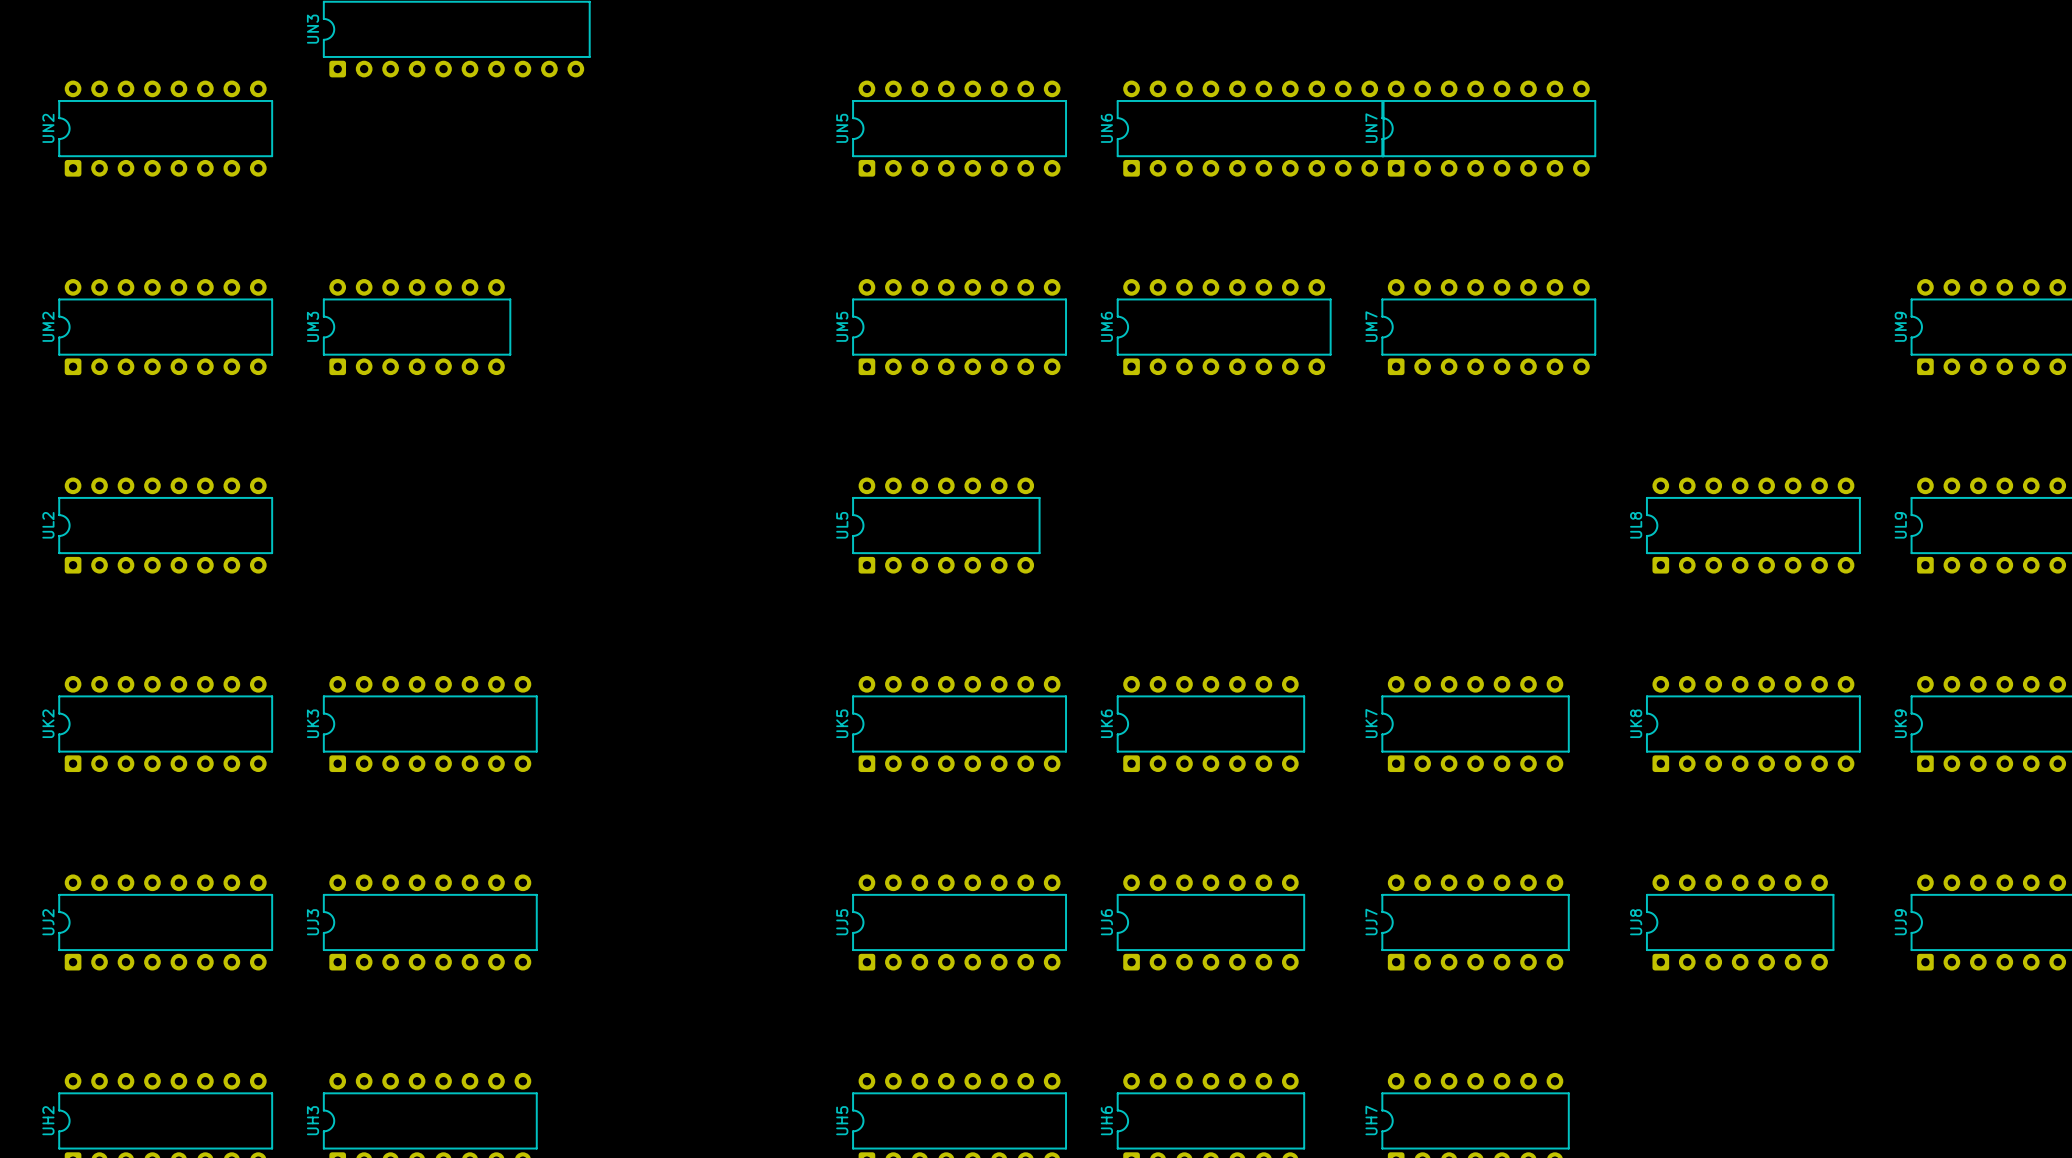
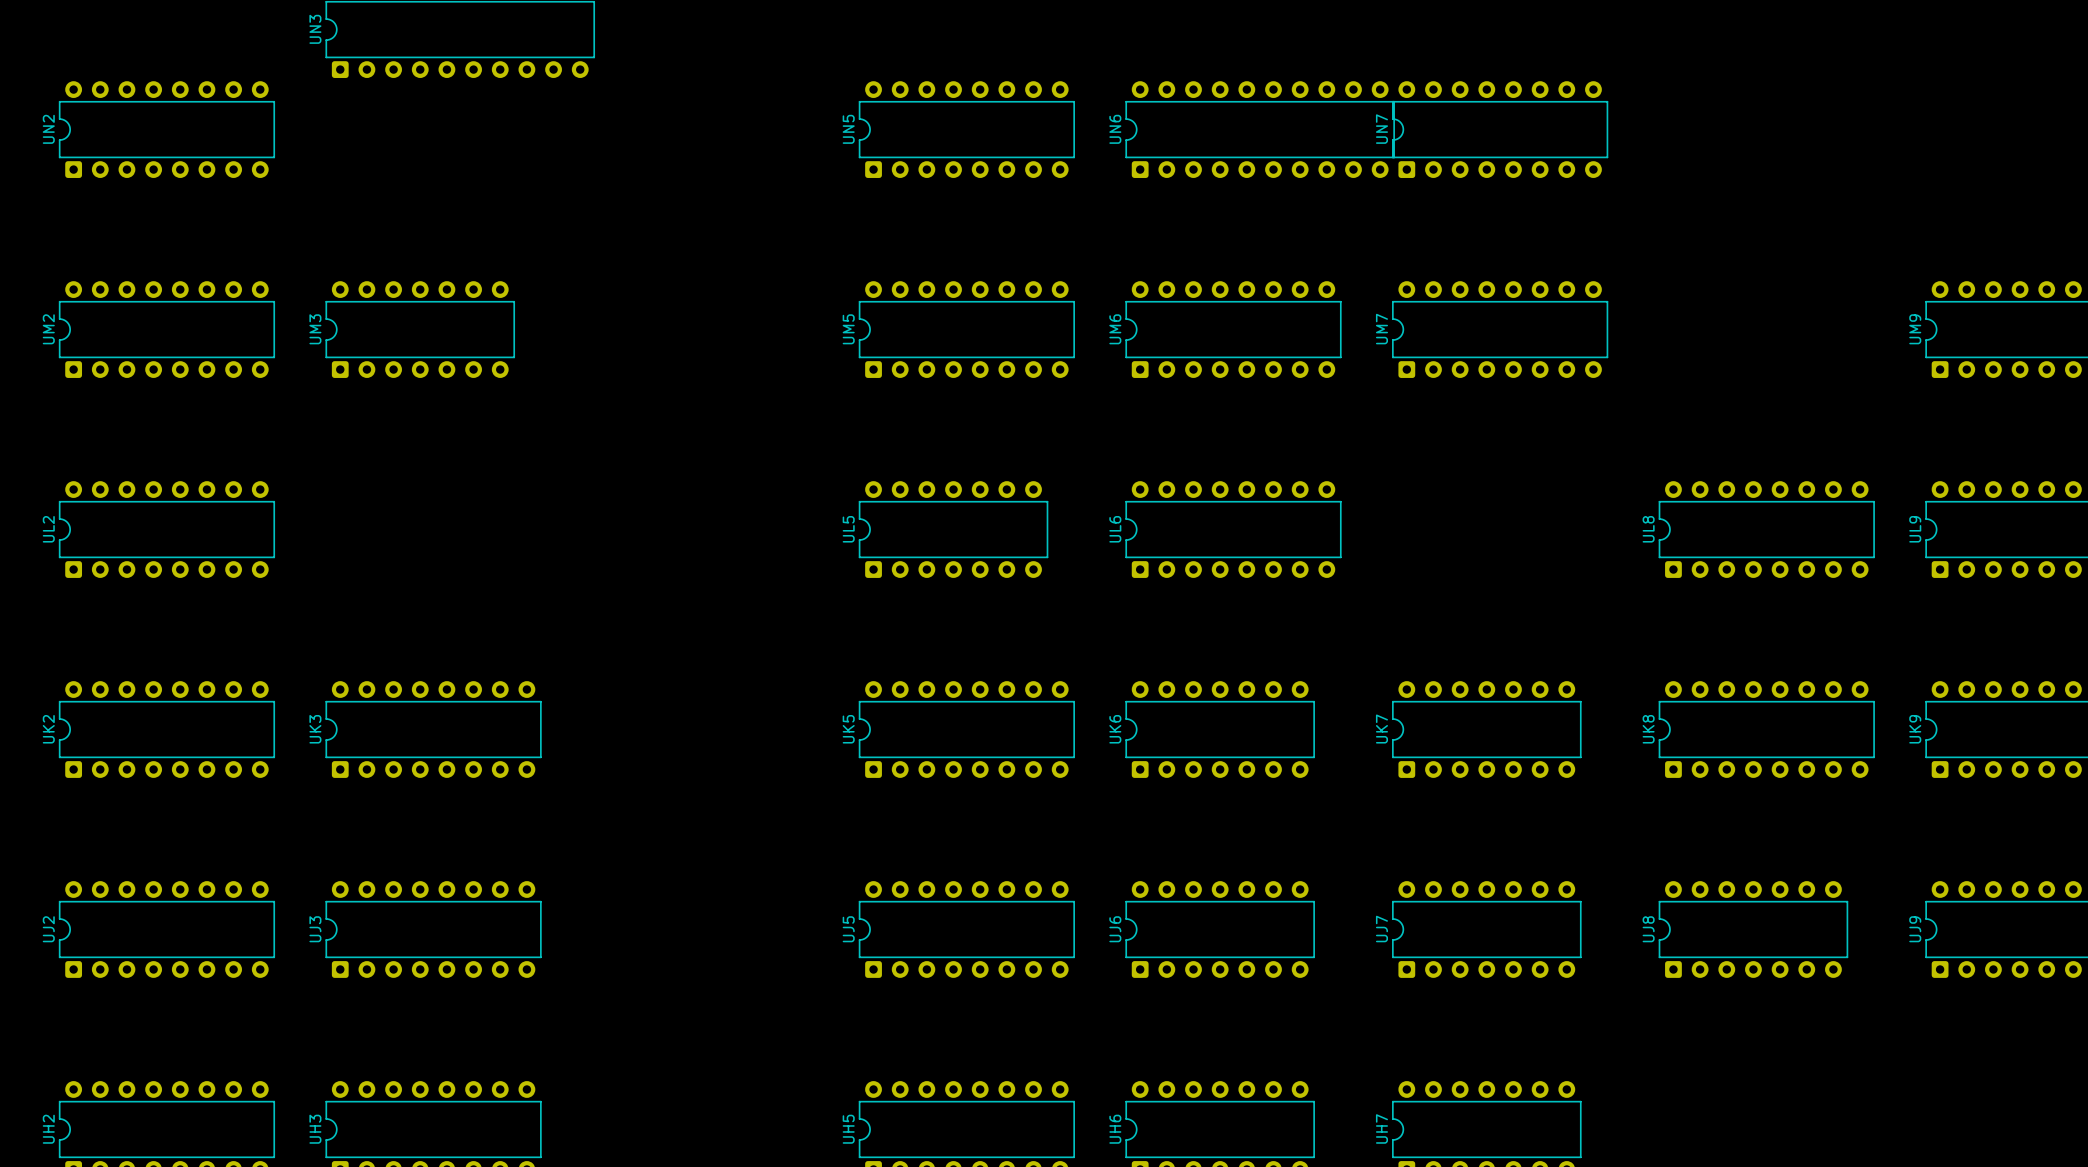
UL6: none -> (1233, 529)

